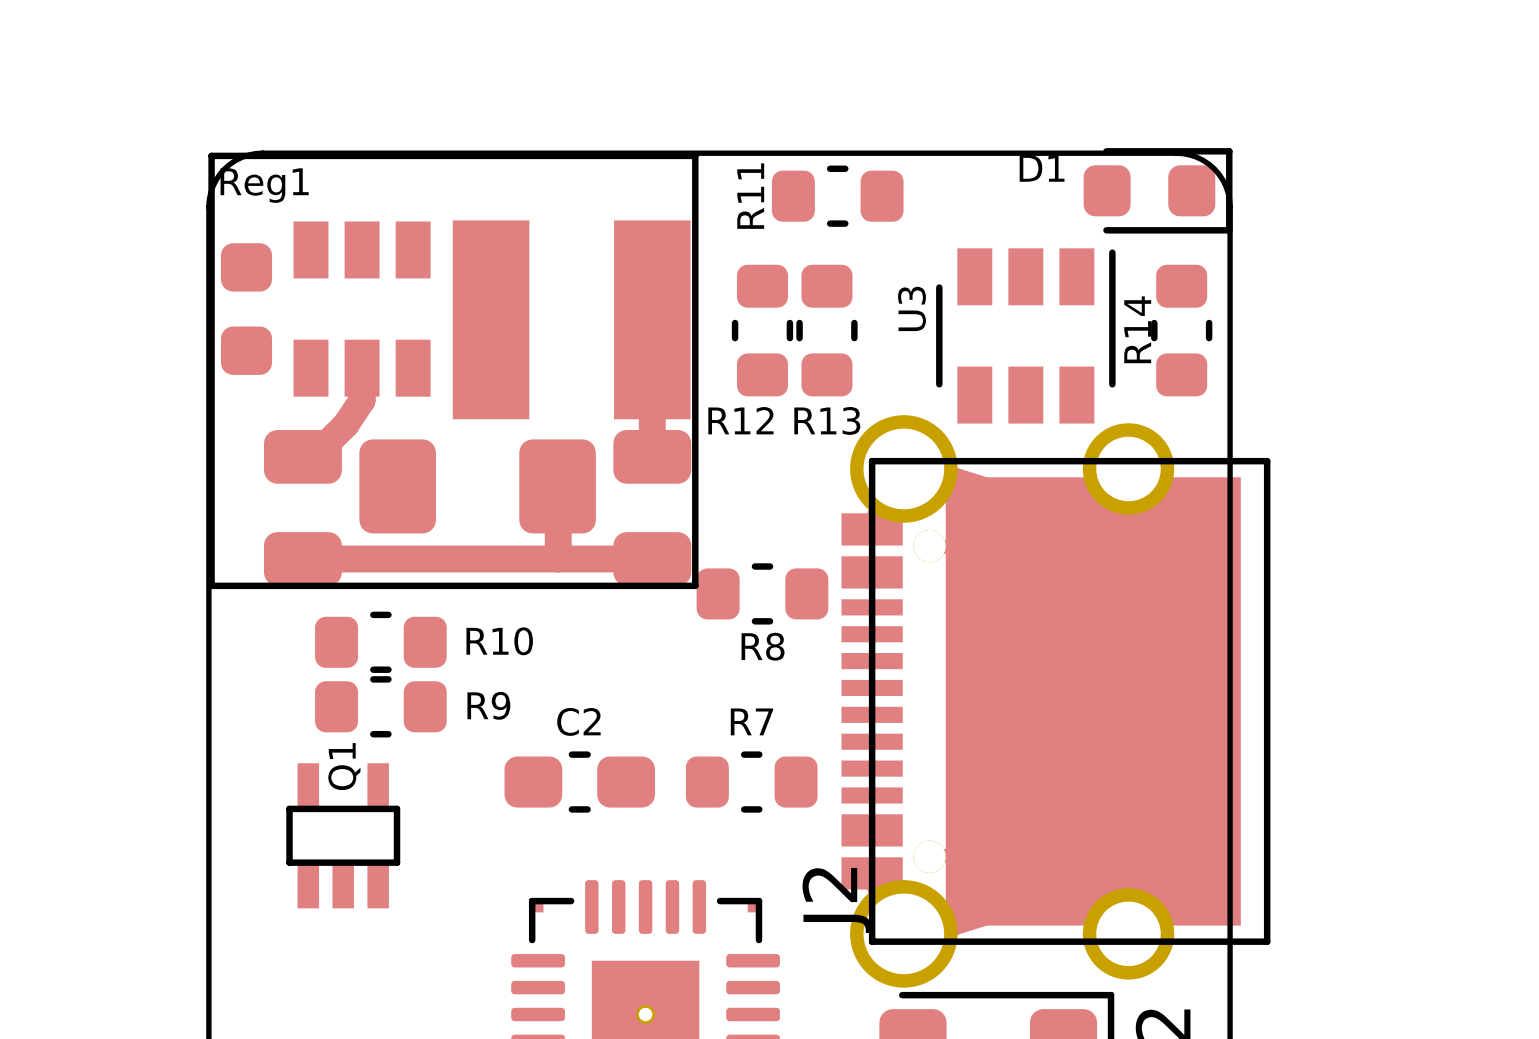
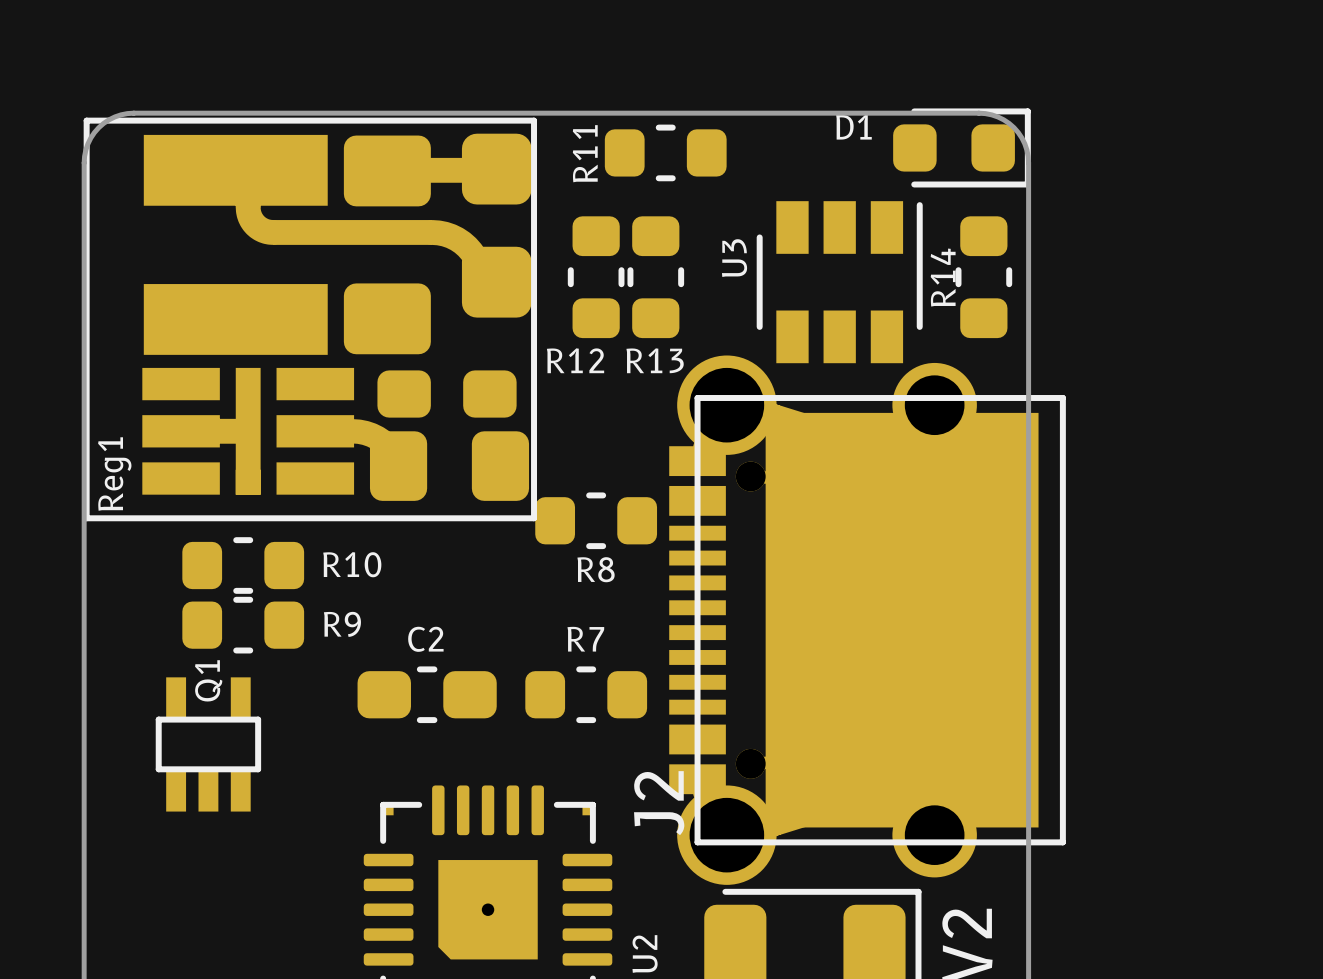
Reg1 footprint: [208, 152, 699, 590] -> [83, 117, 537, 522]
Reg1 name position: Reg1 (264, 185) -> Reg1 (114, 474)

